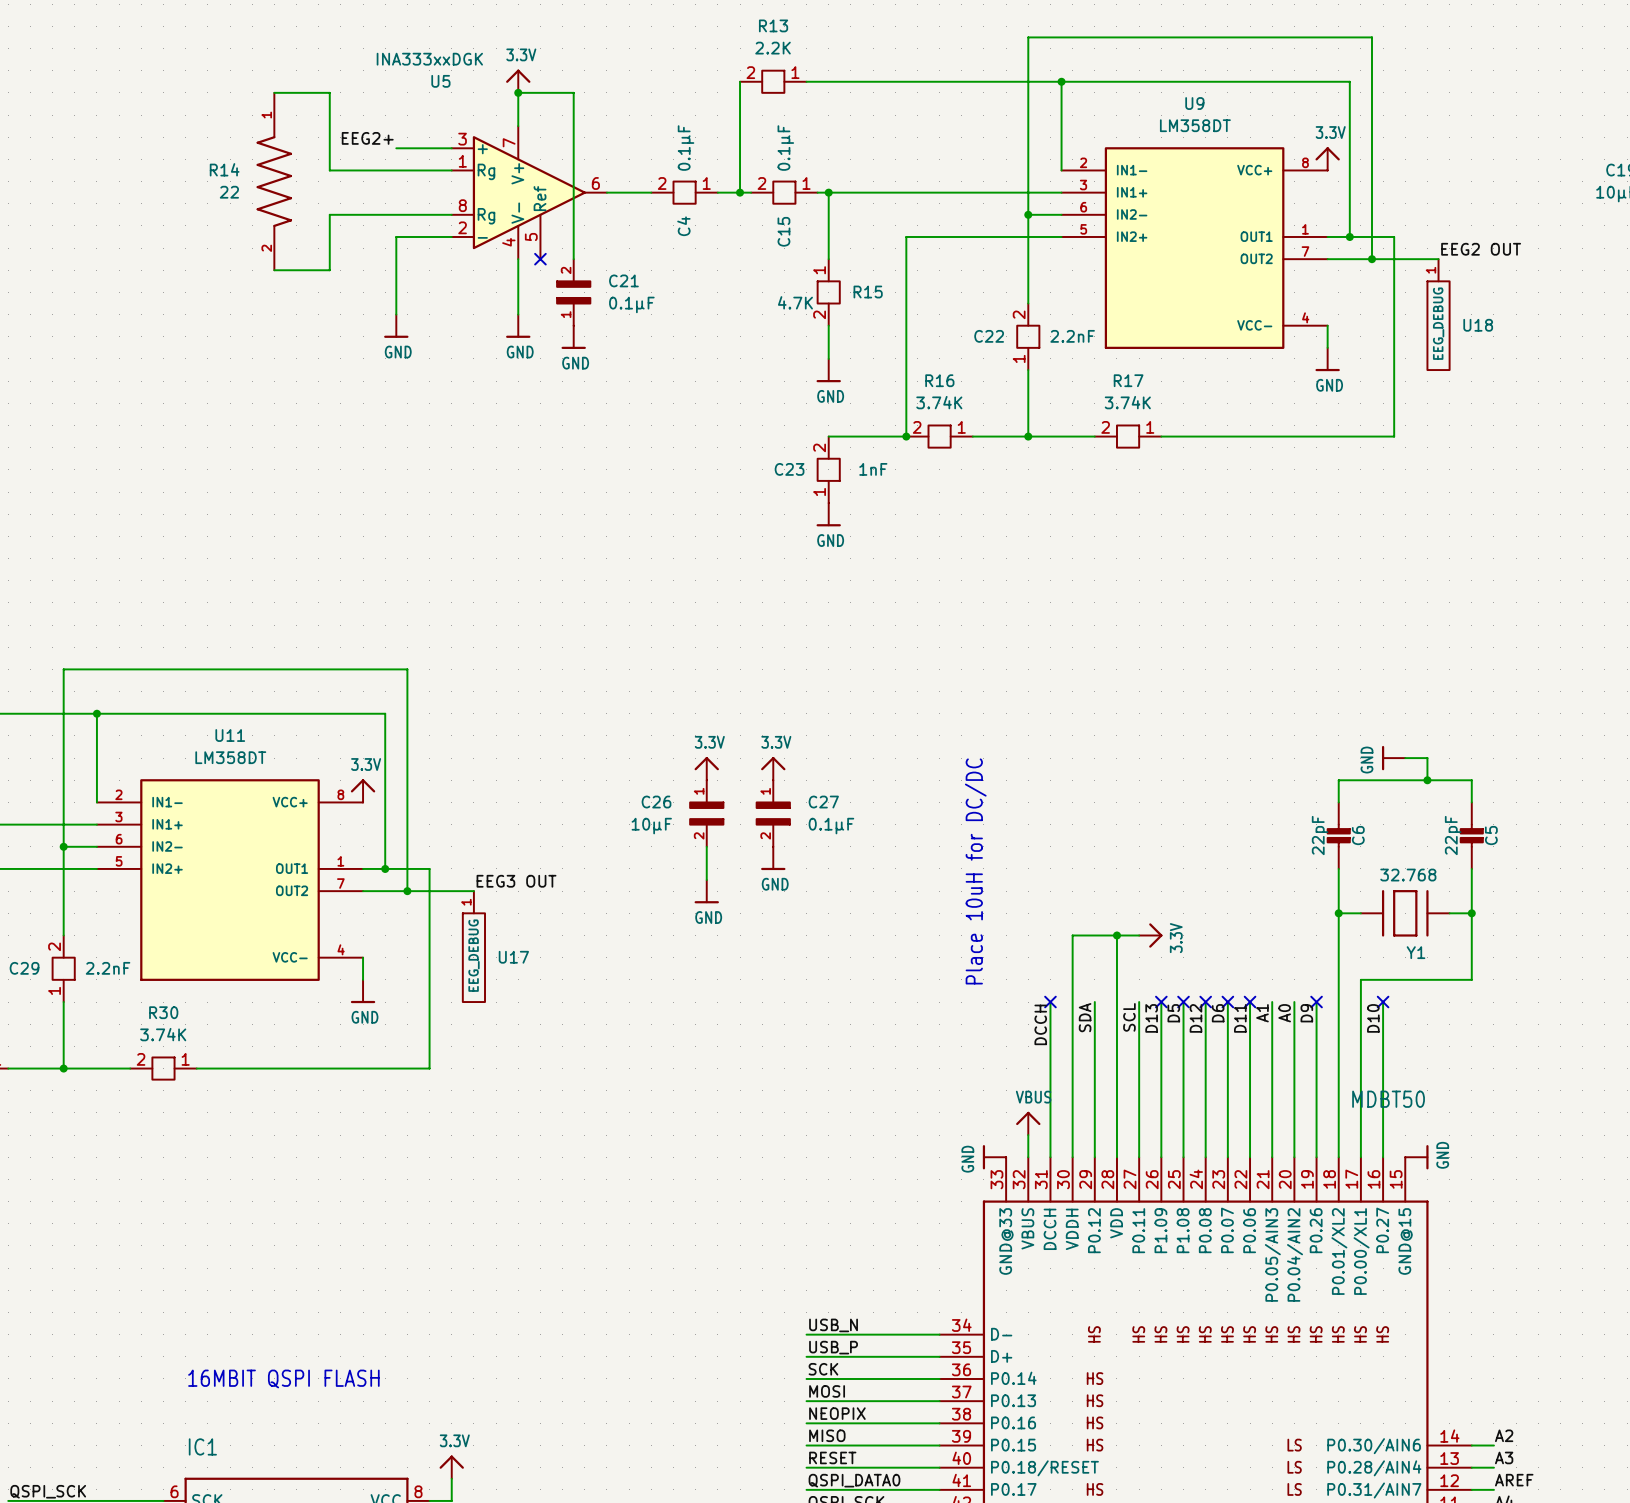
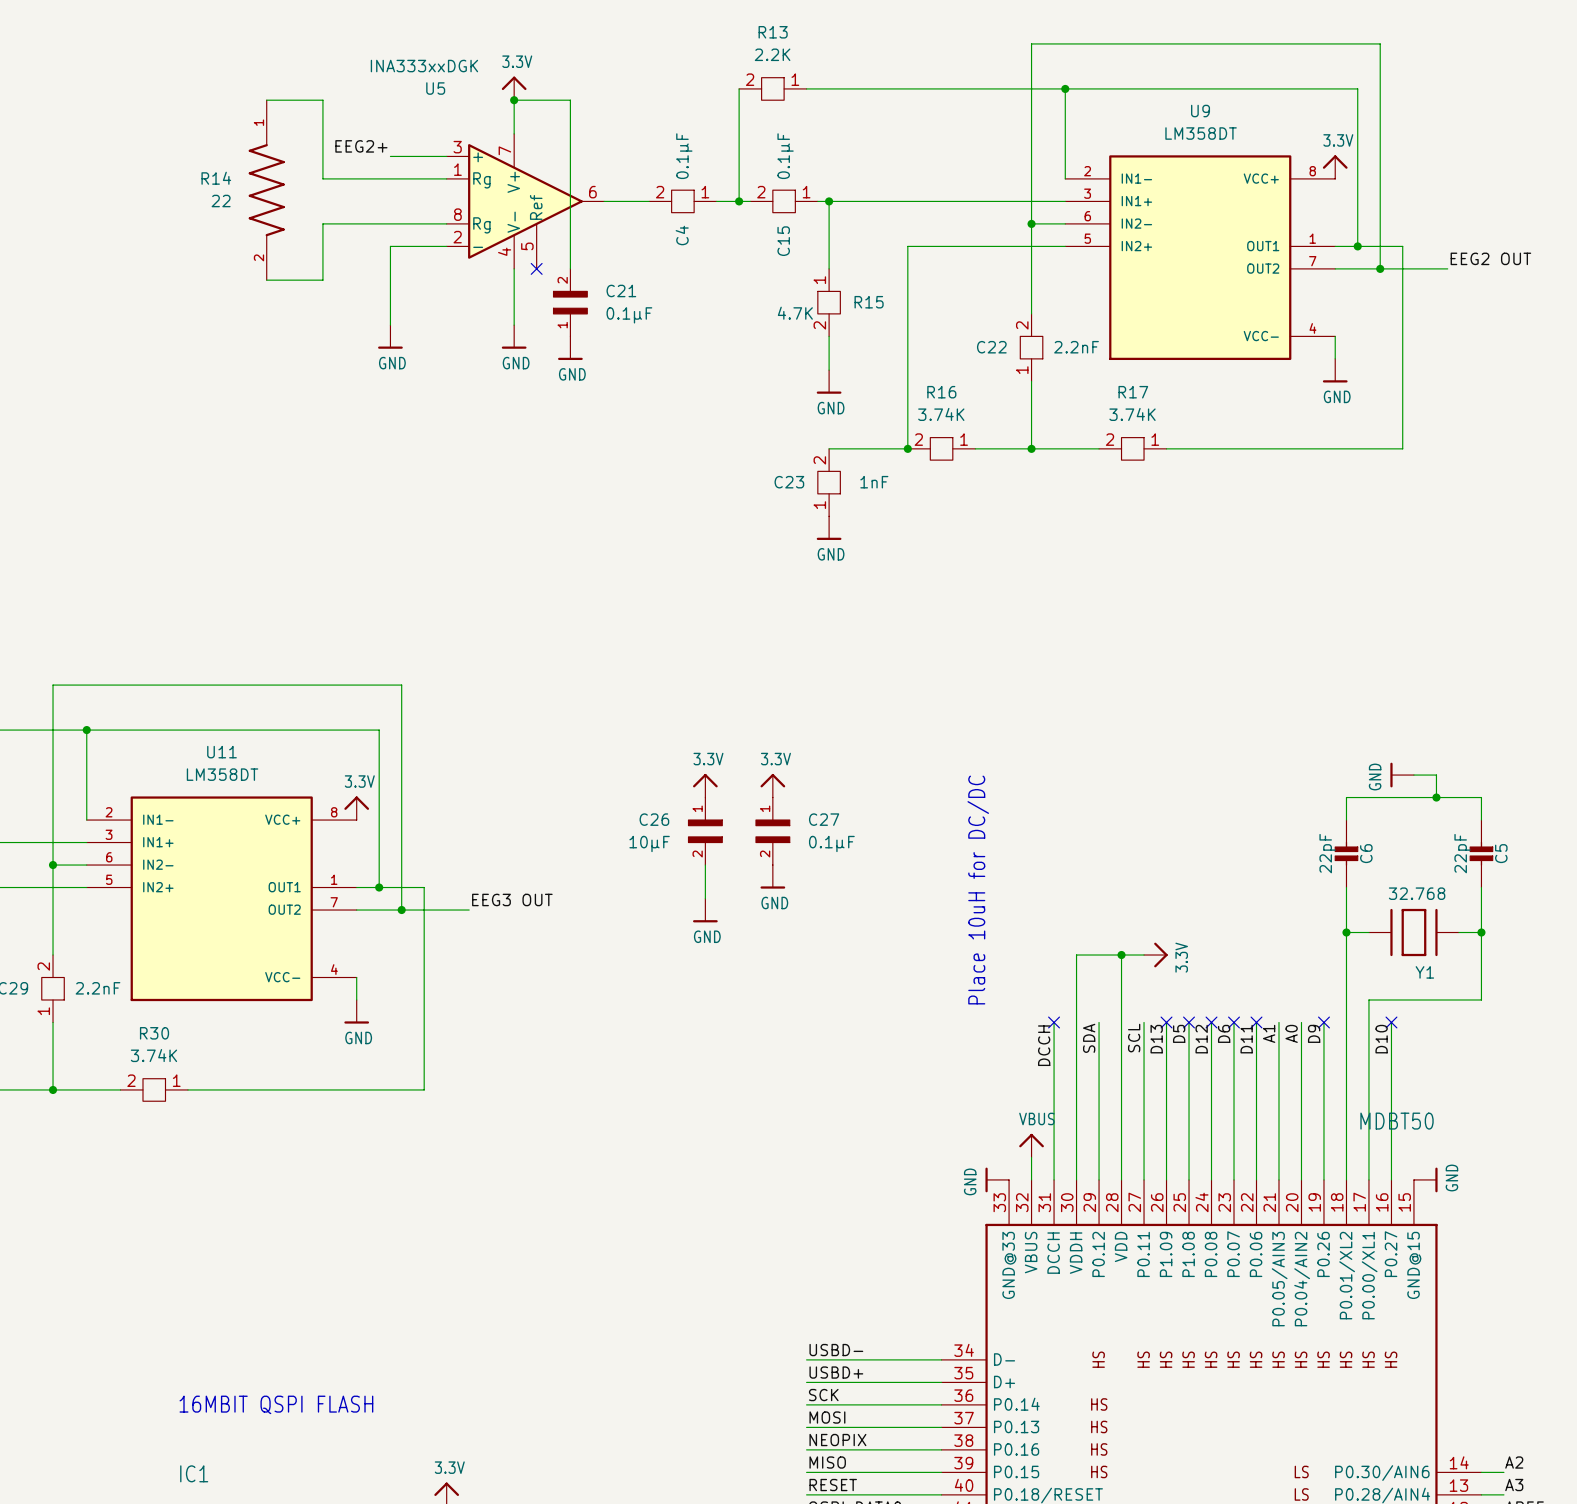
U18: (1438, 314) -> none
U17: (473, 946) -> none
label: USB_N (833, 1325) -> USBD- (836, 1350)
label: USB_P (833, 1347) -> USBD+ (836, 1372)

